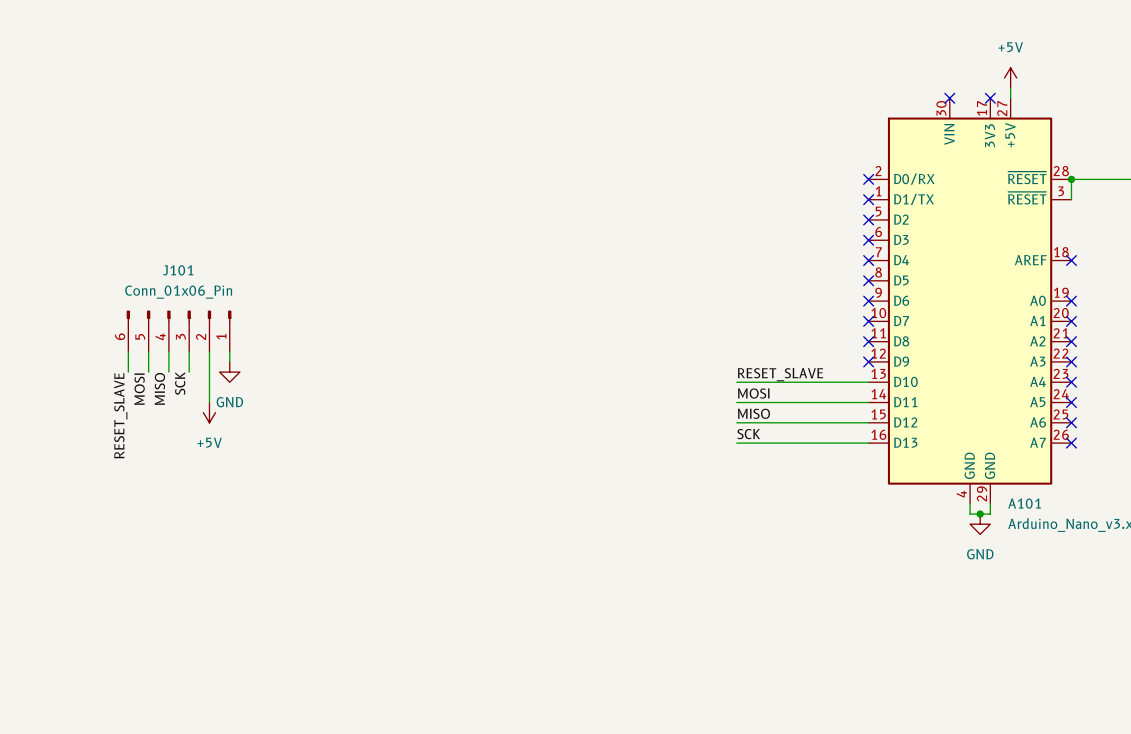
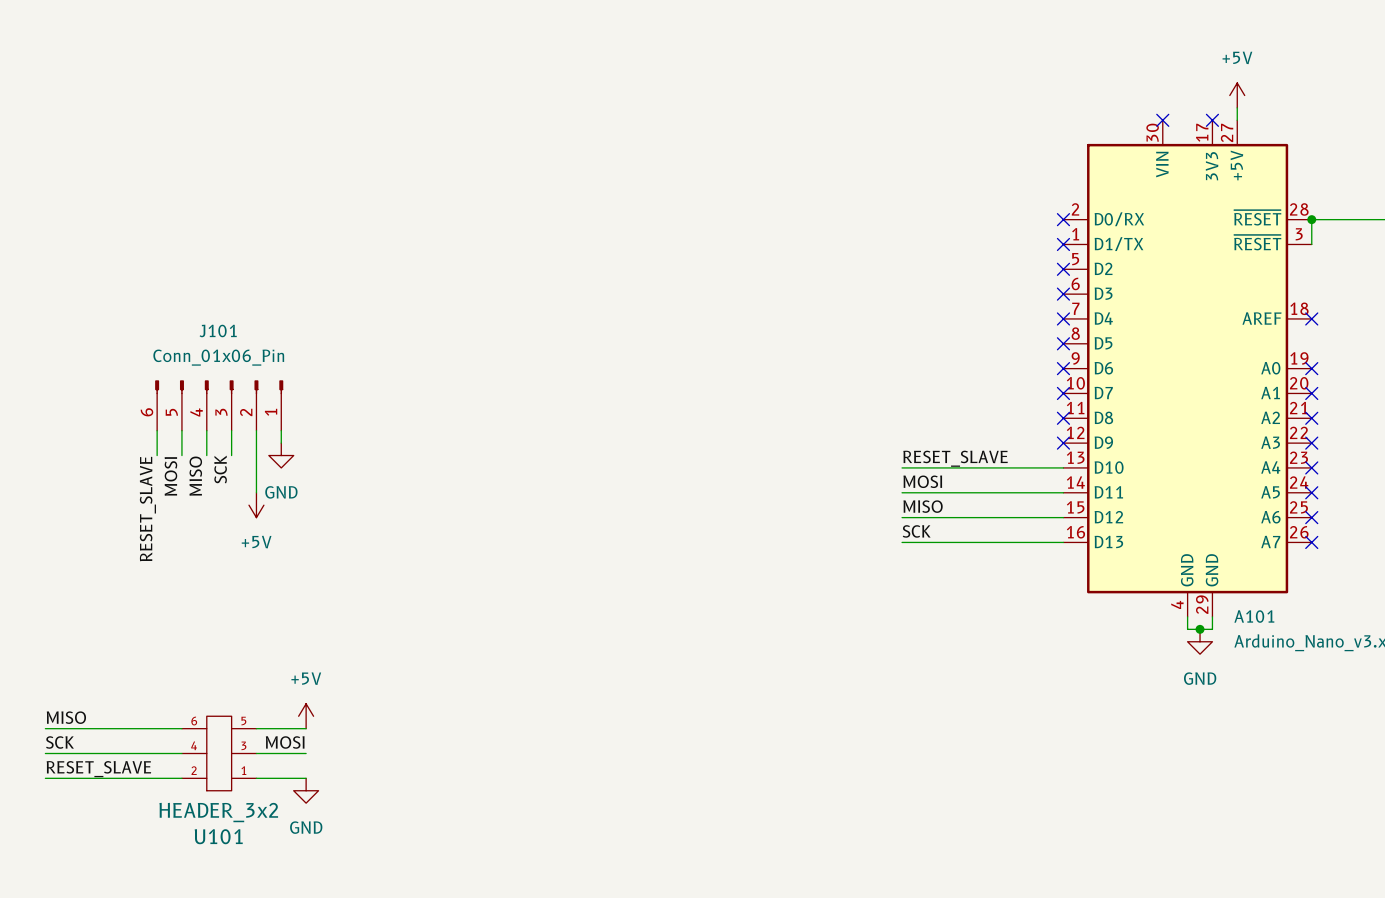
power symbol: none -> +5V (306, 716)
label: none -> MISO (66, 717)
wire: none -> (45, 728) (181, 728)
wire: none -> (256, 728) (306, 728)
label: none -> SCK (59, 742)
label: none -> MOSI (285, 742)
wire: none -> (45, 753) (181, 753)
U101: none -> HEADER_3x2 (219, 753)
wire: none -> (256, 753) (306, 753)
label: none -> RESET_SLAVE (98, 769)
wire: none -> (45, 778) (181, 778)
wire: none -> (256, 778) (306, 778)
power symbol: none -> GND (306, 790)

